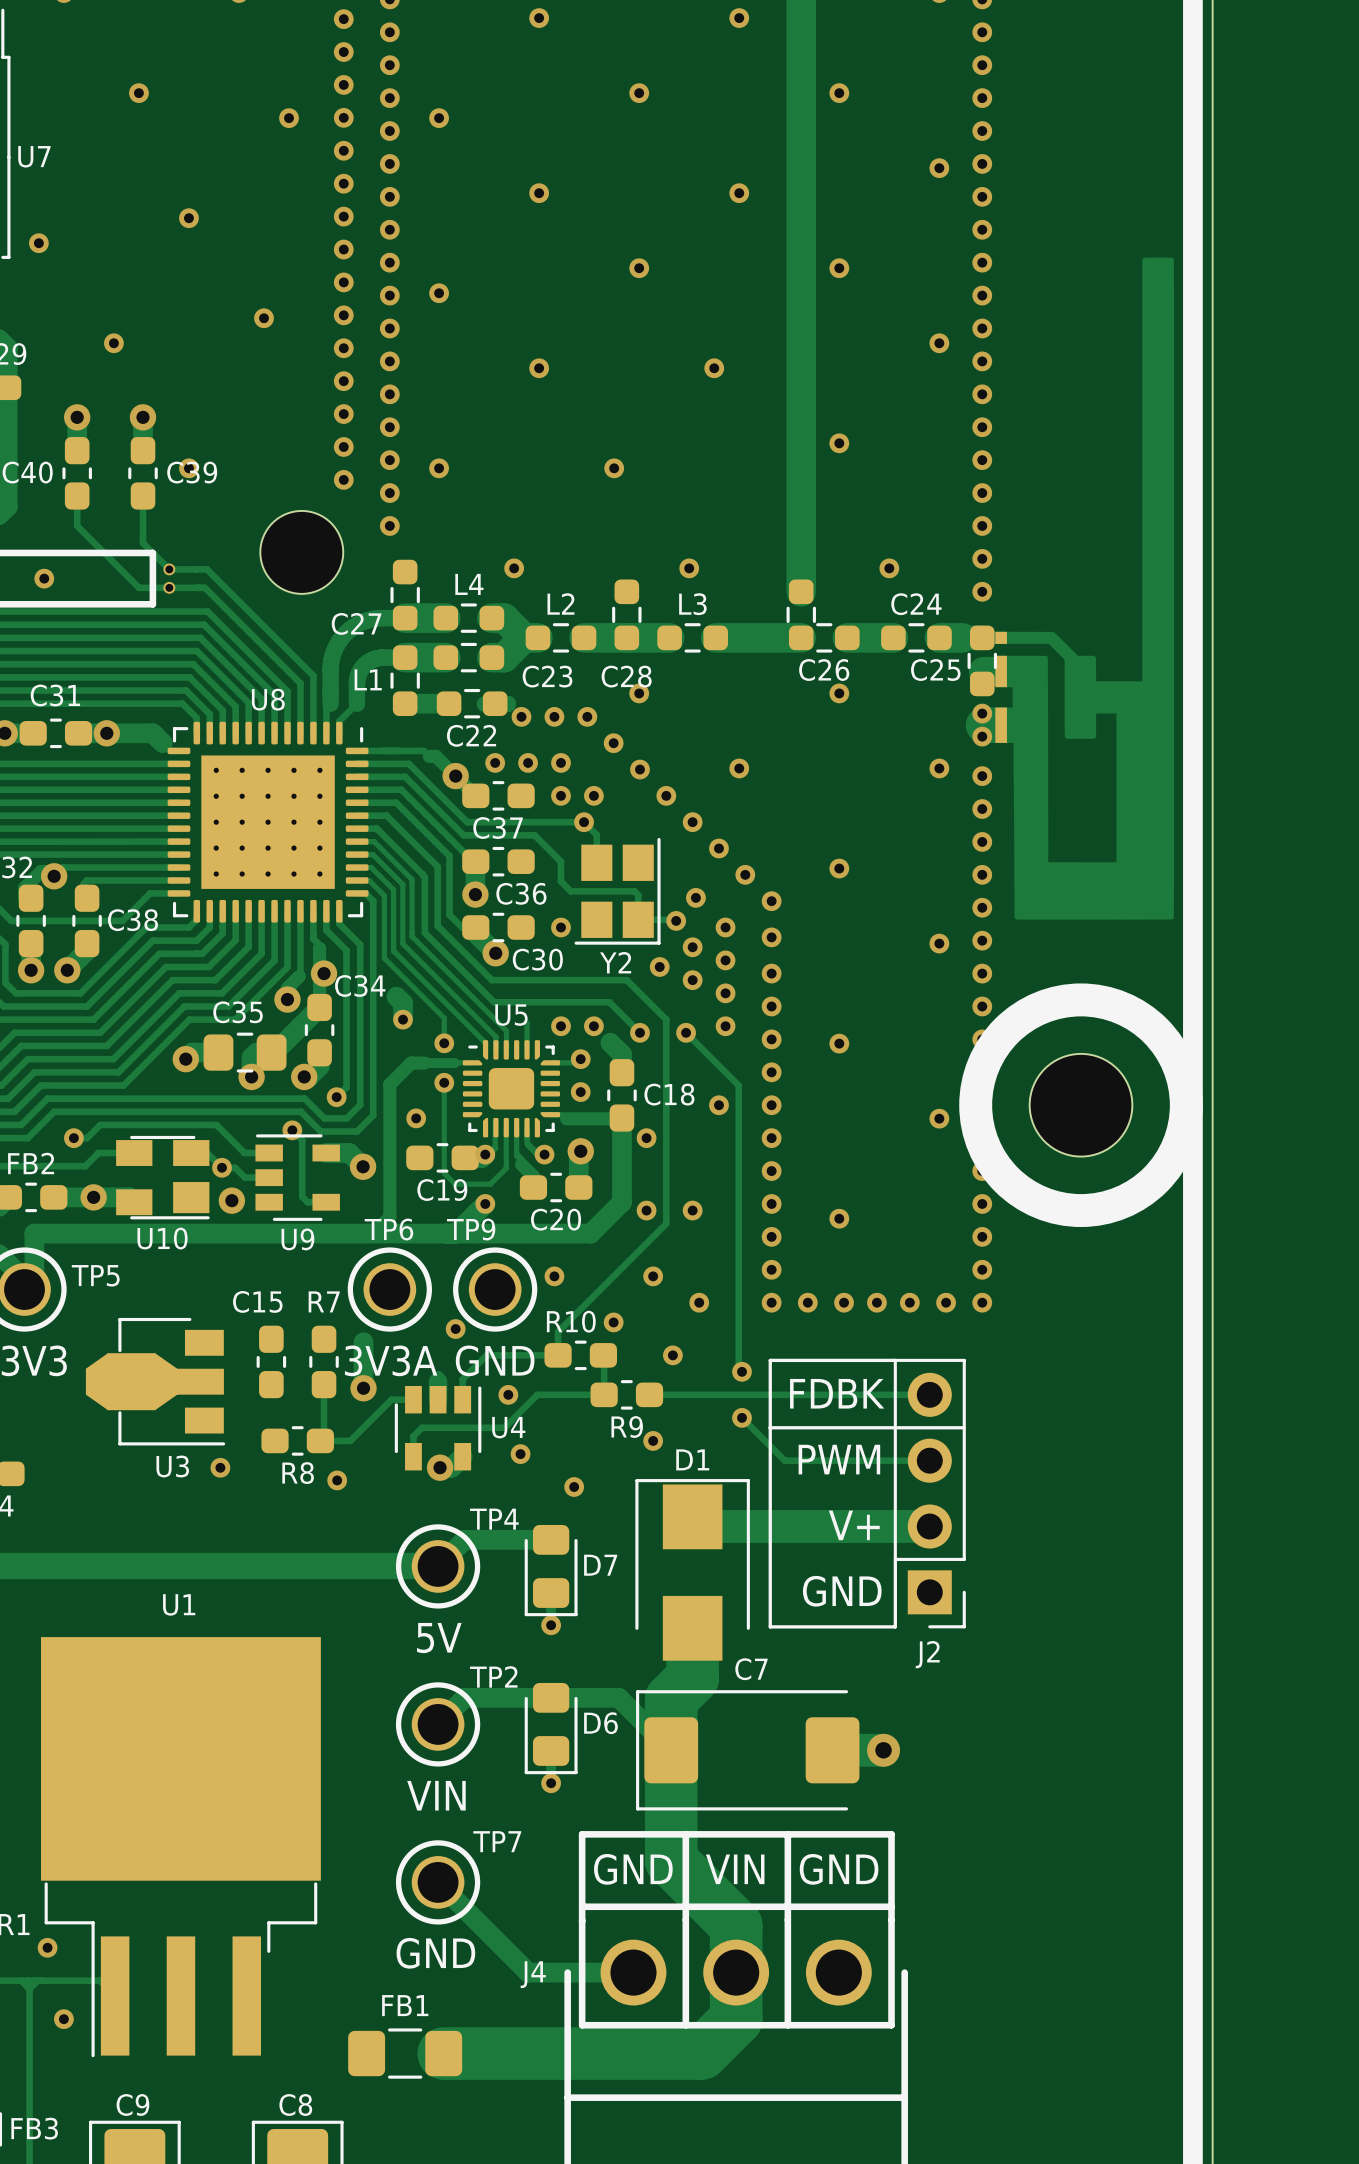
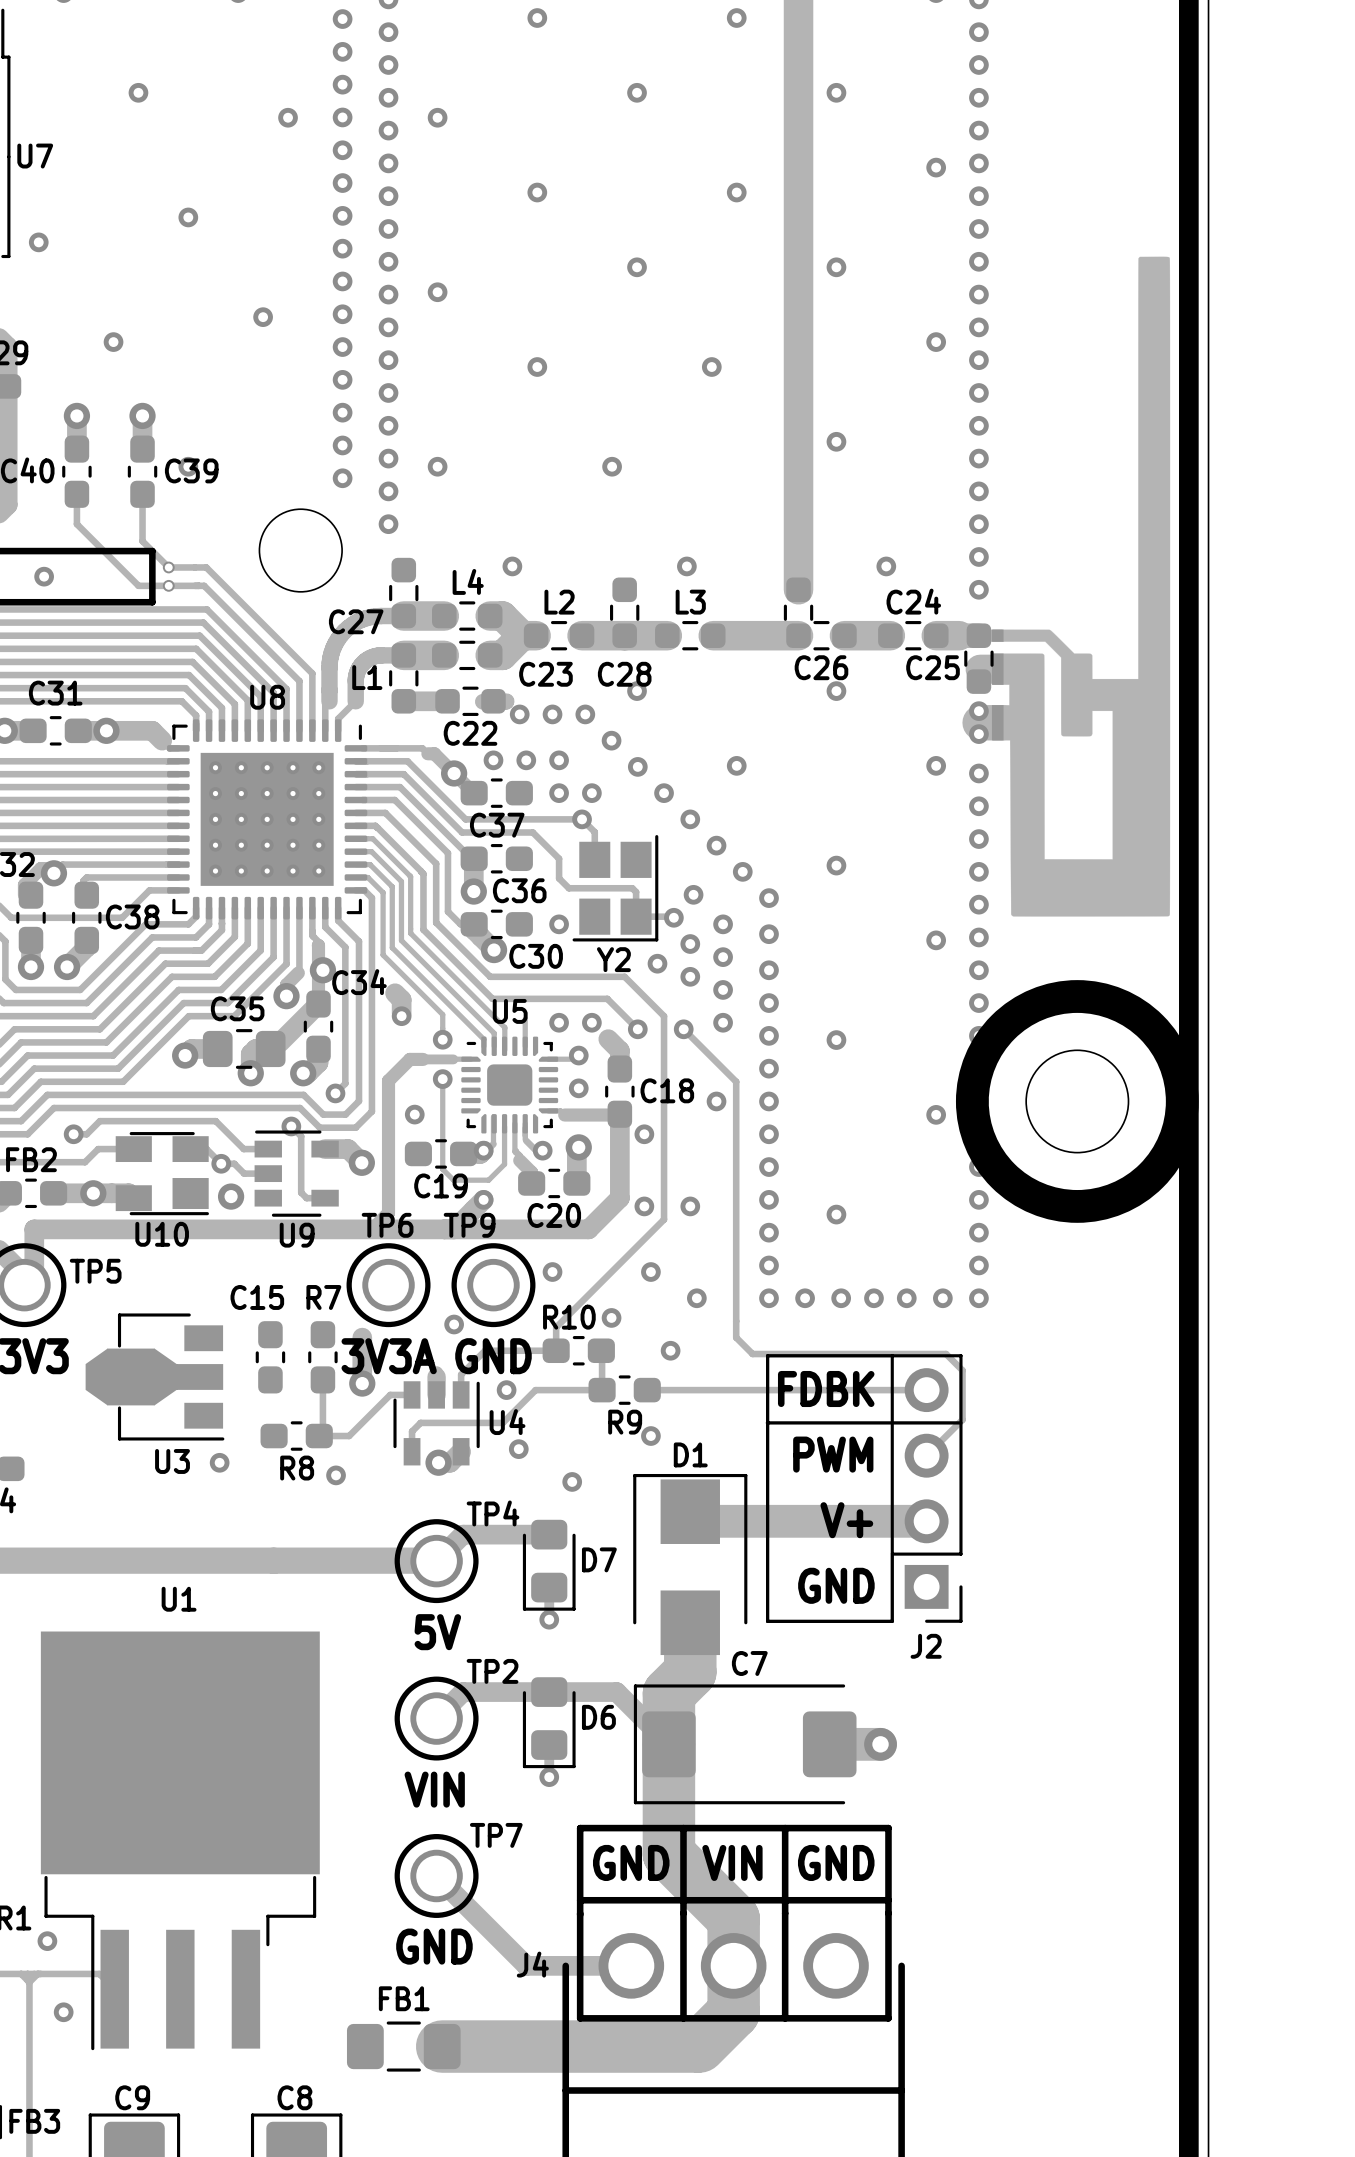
track: (738, 1342) (738, 1368) (742, 1371) -> none
via: (742, 1371) -> none
track: (742, 1417) (784, 1460) (929, 1460) -> (736, 1337) (752, 1354) (946, 1354) (962, 1370) (962, 1419) (926, 1455)
via: (742, 1417) -> none

